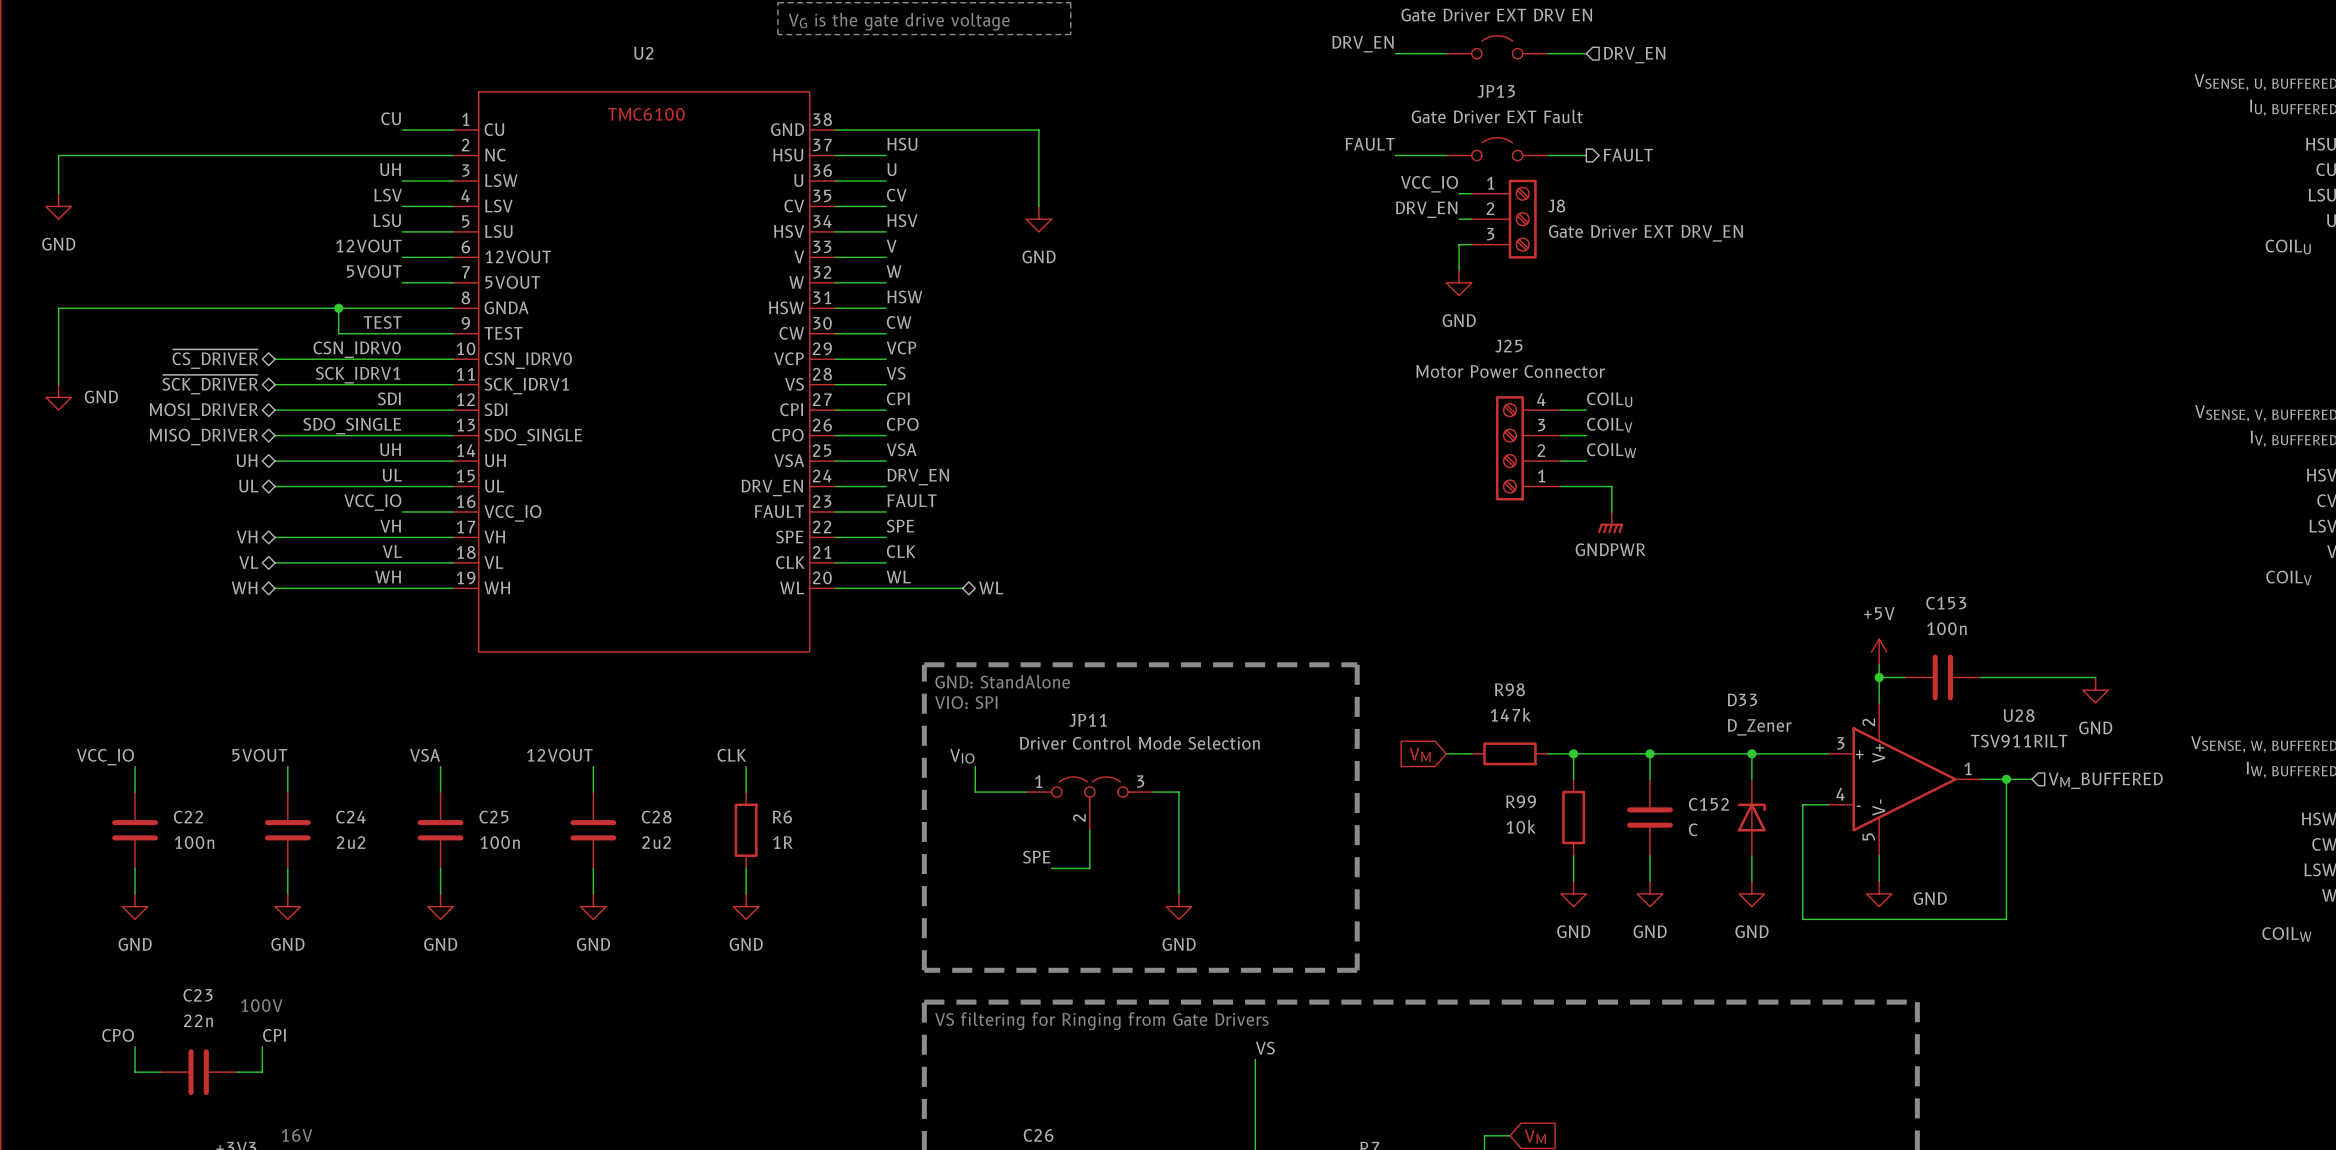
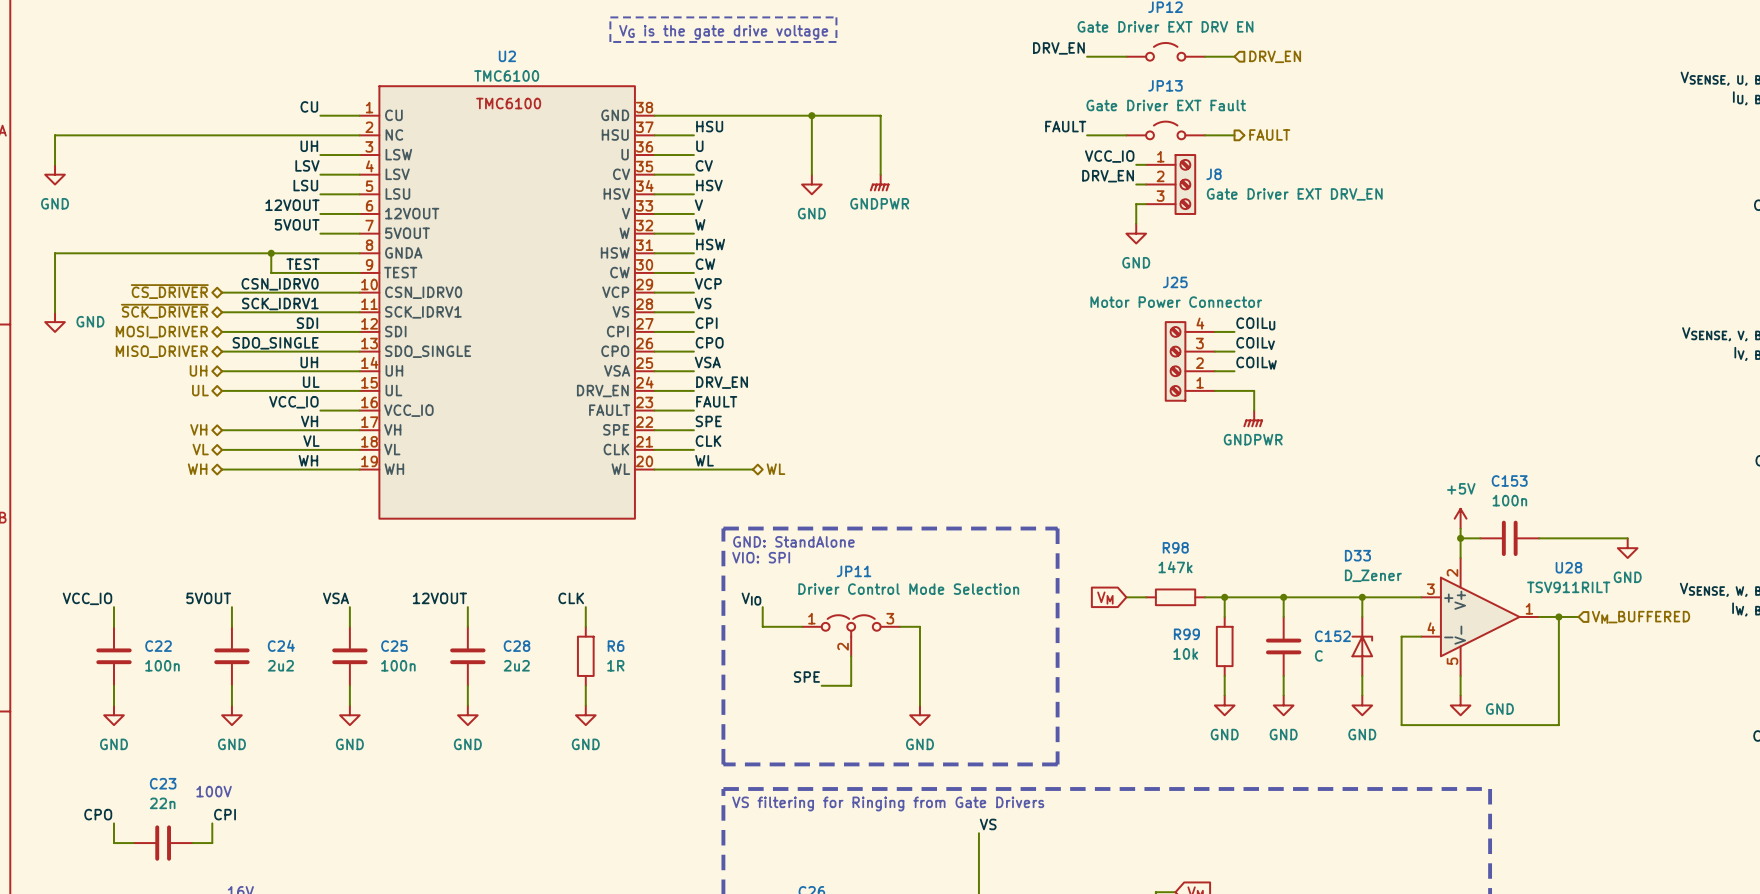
U2 value: none -> TMC6100 (506, 76)
wire: none -> (811, 115) (880, 115) (880, 174)
junction: none -> (811, 115)
power symbol: none -> GNDPWR (879, 182)

